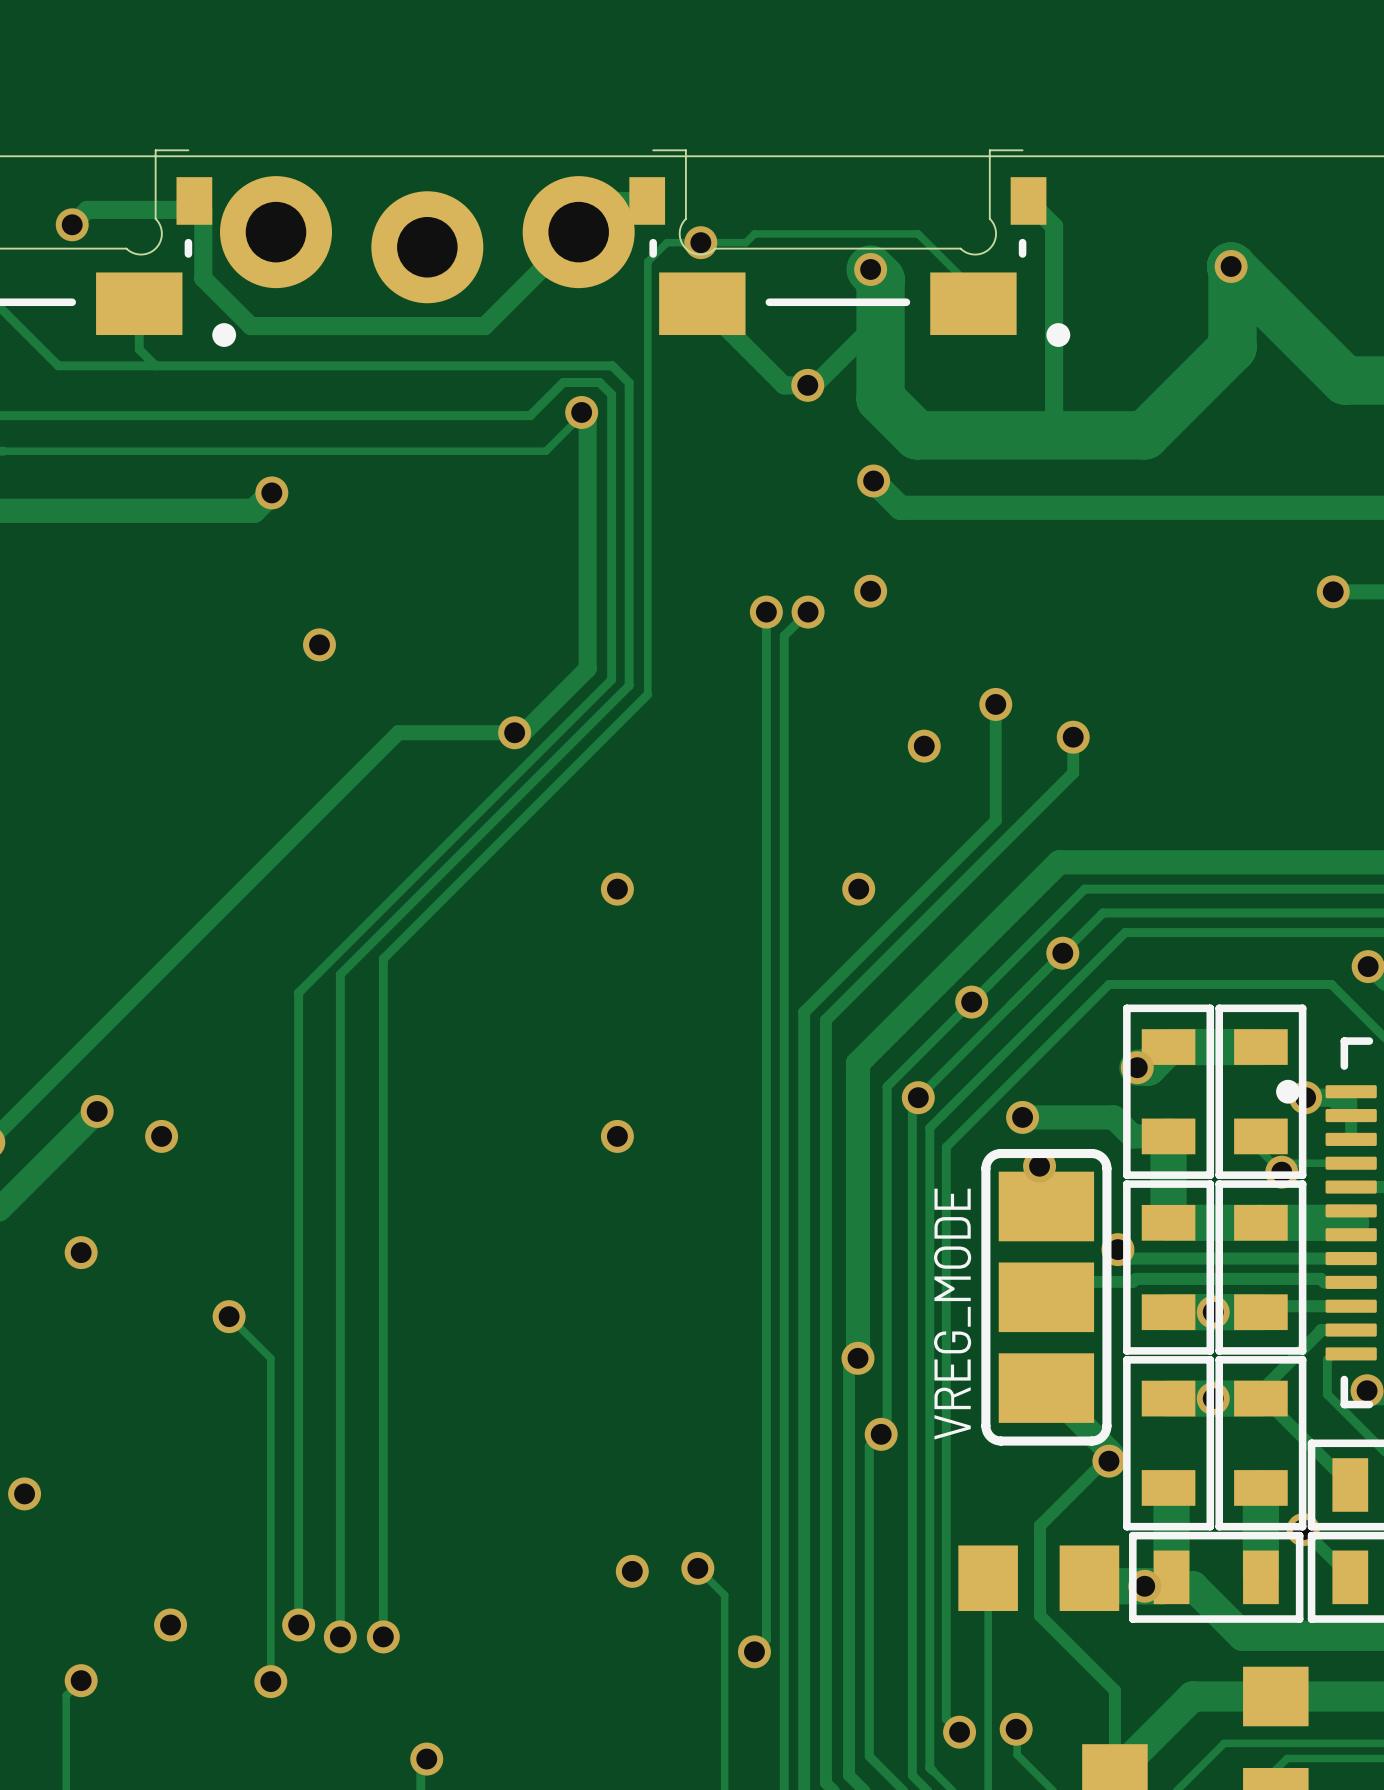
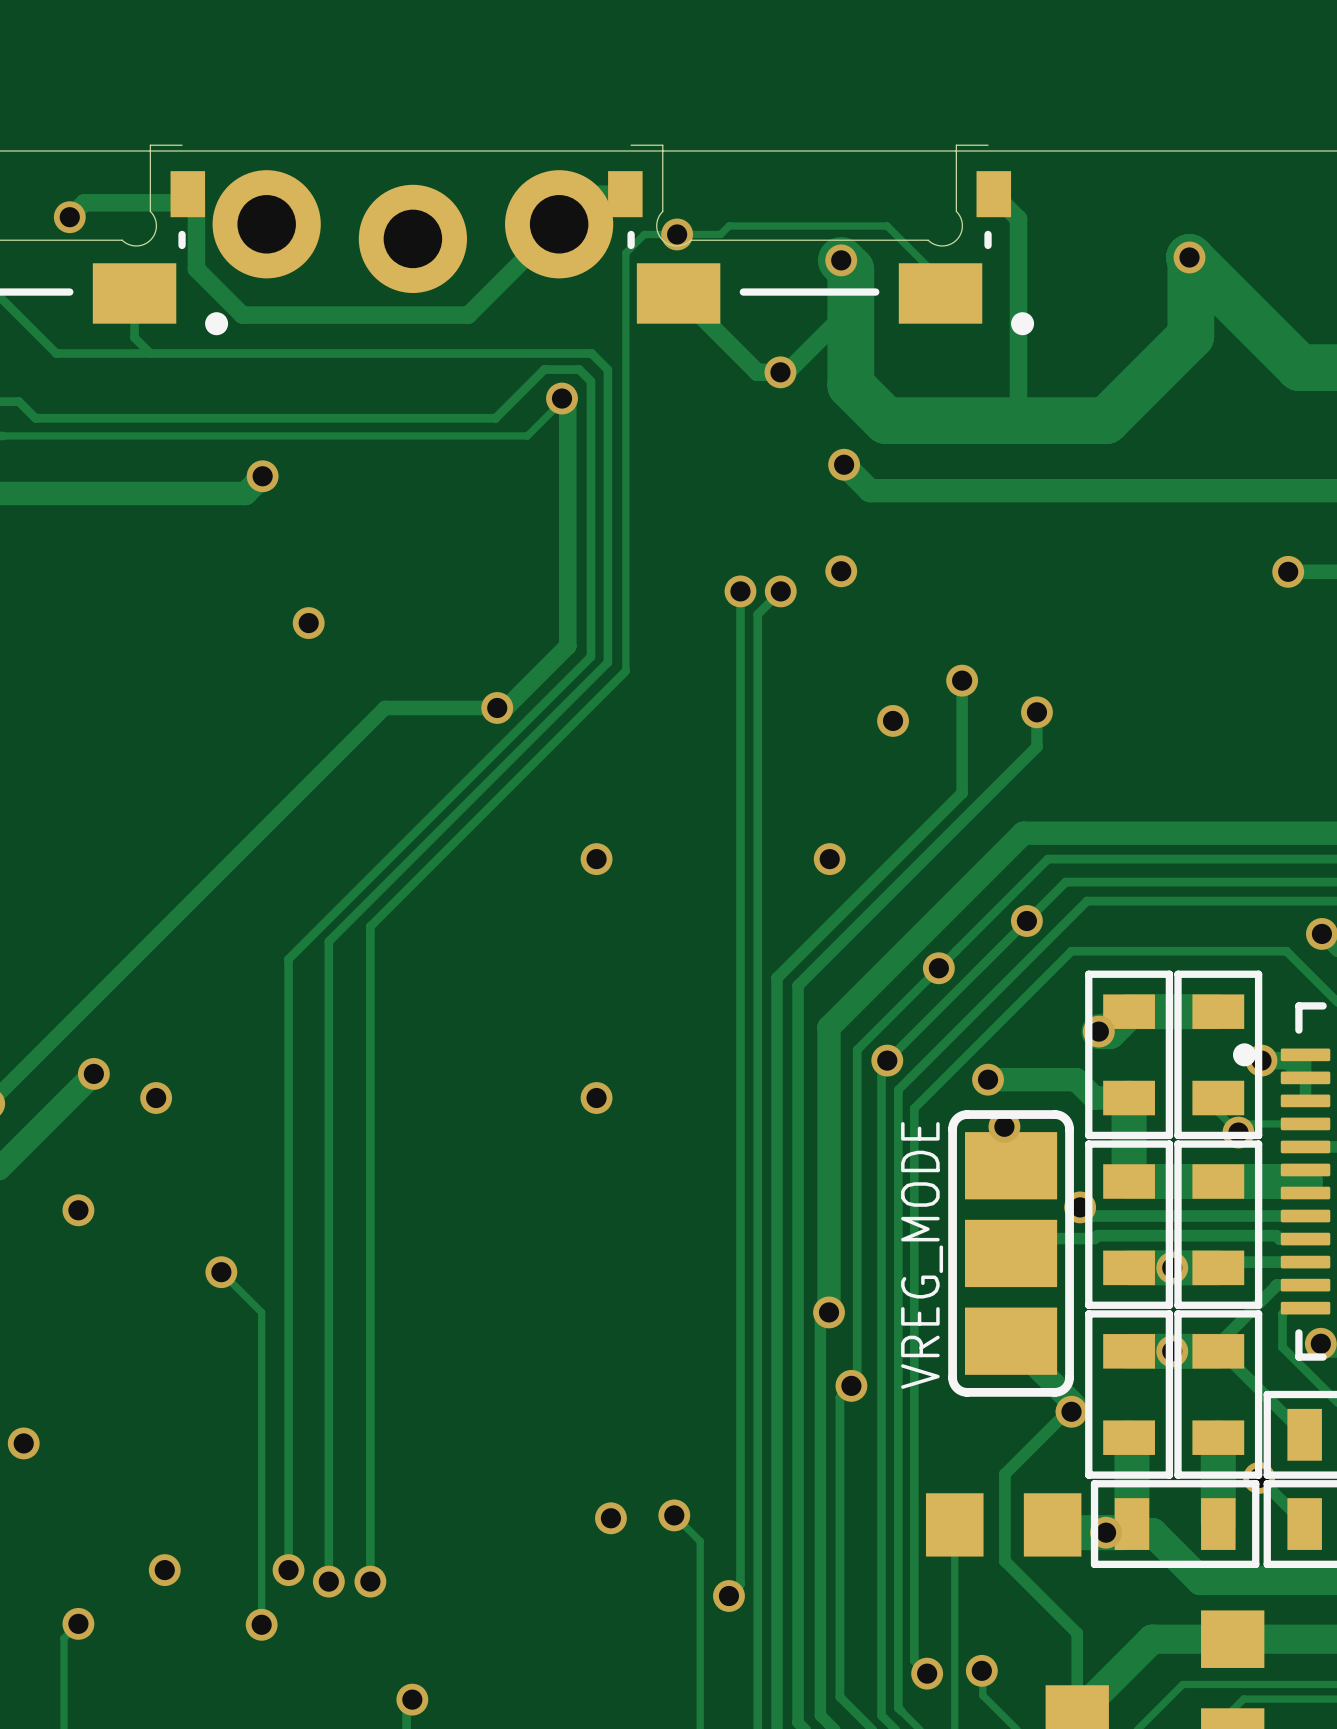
track: (530, 415) (19, 415) -> (512, 401) (495, 418) (35, 418) (18, 401)

